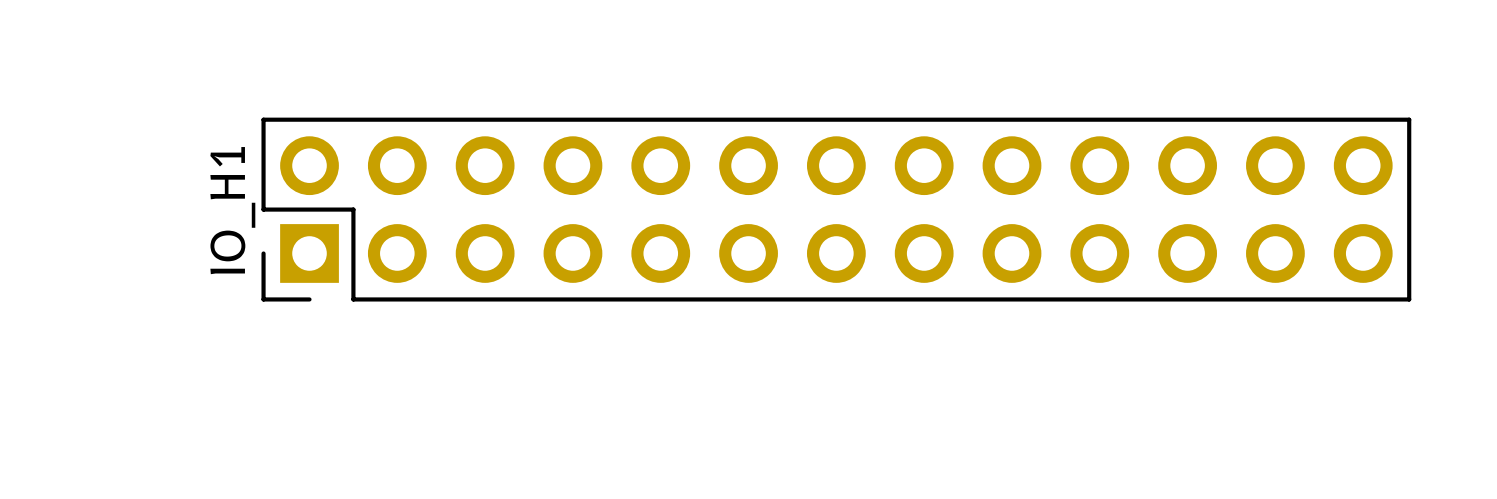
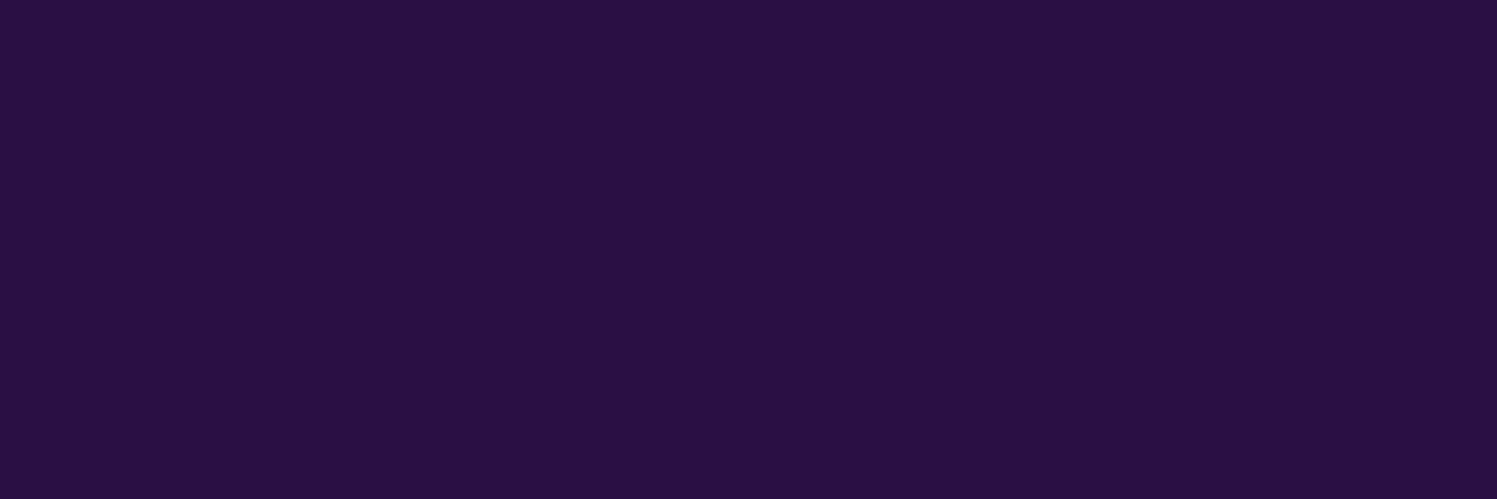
IO_H1: (836, 209) -> none

